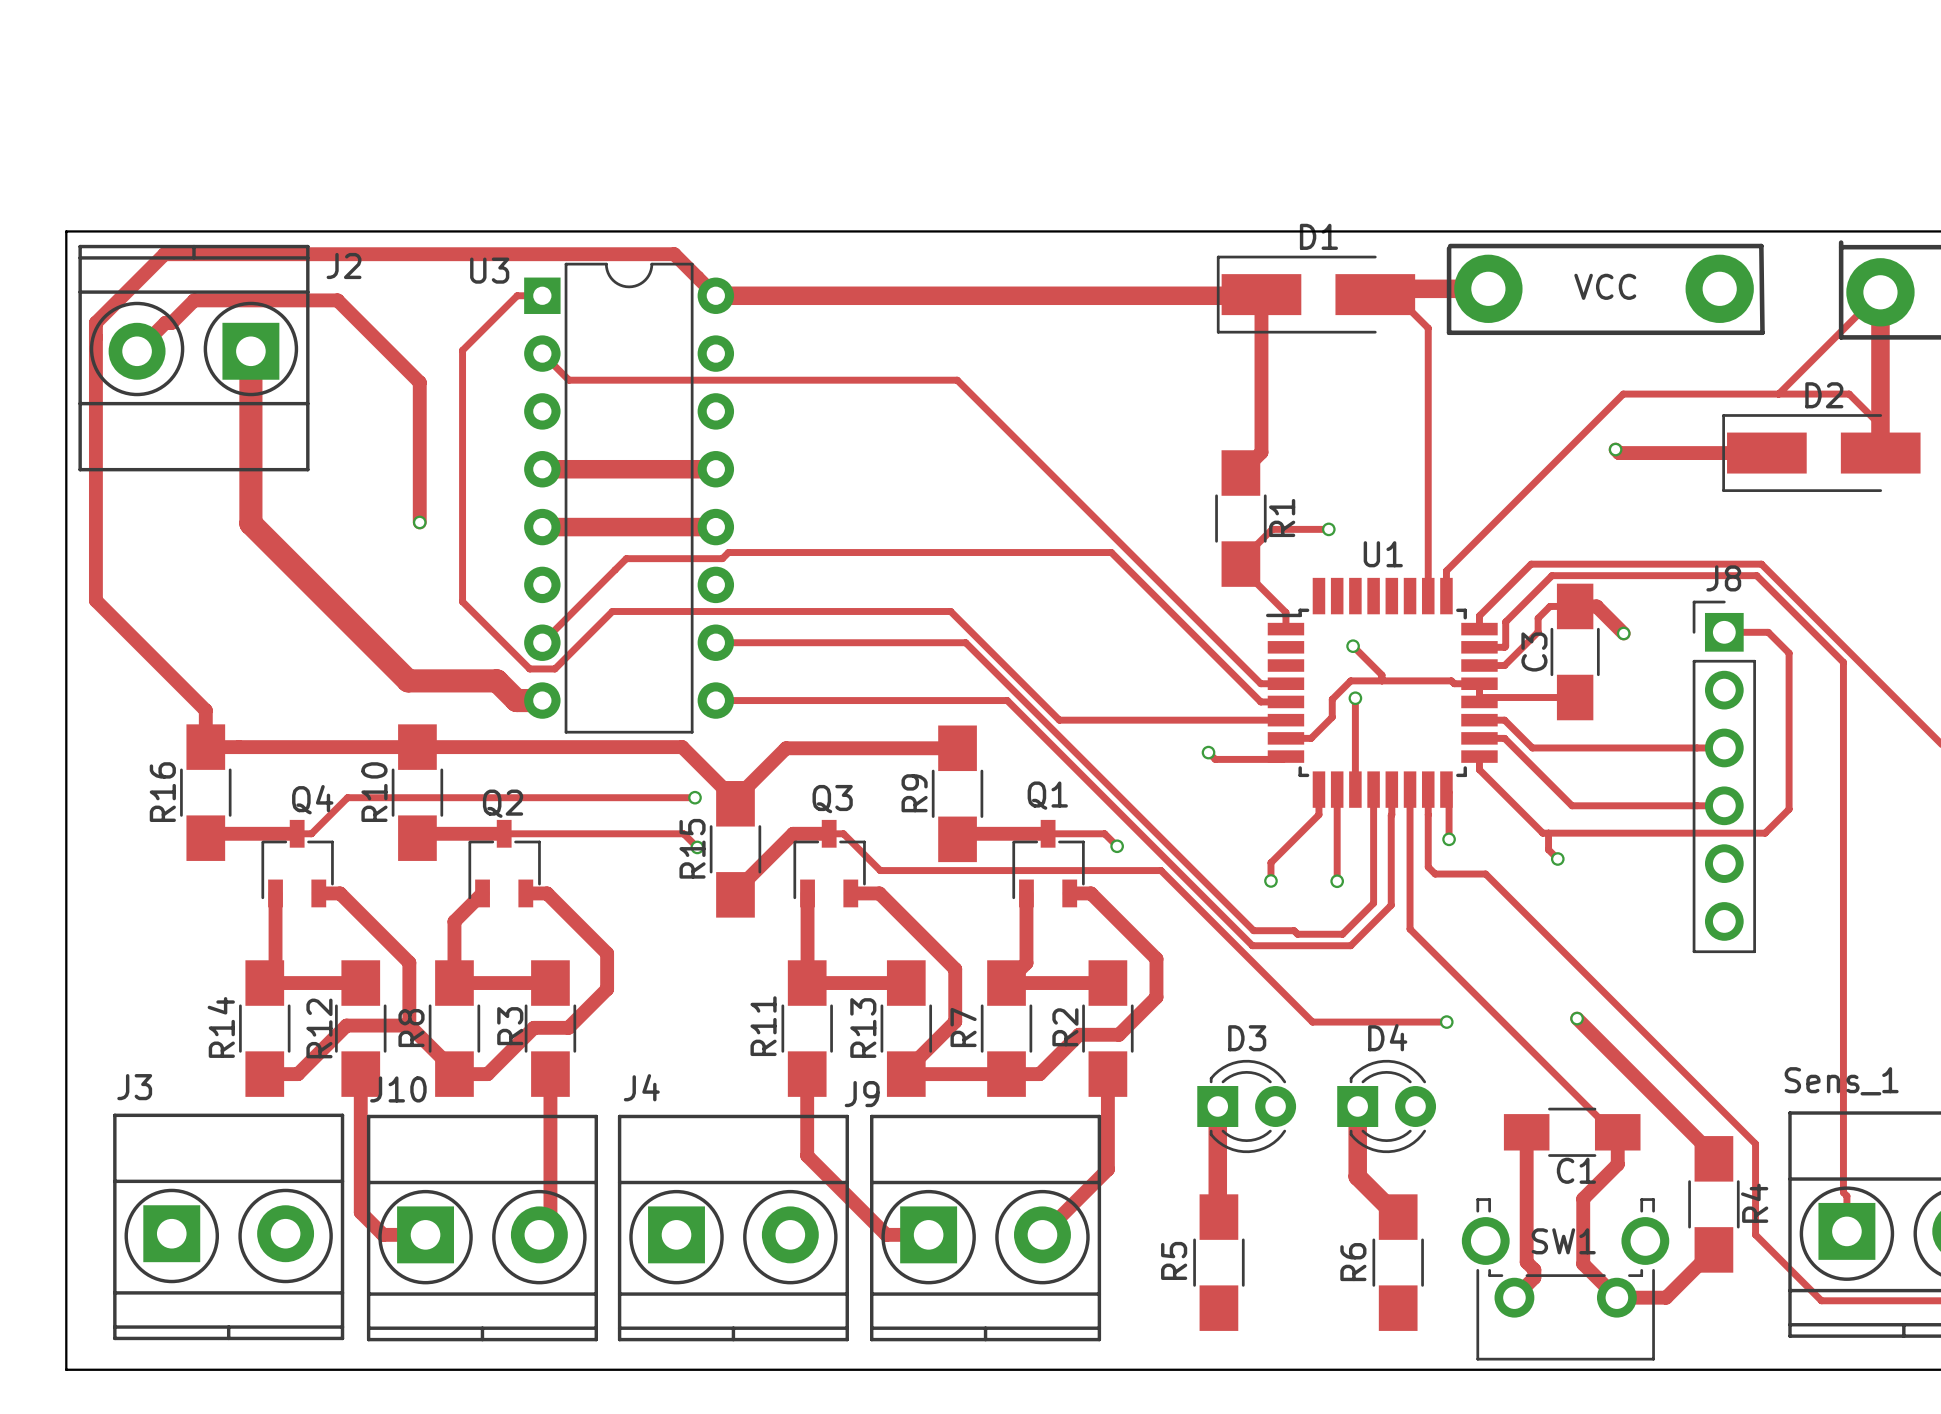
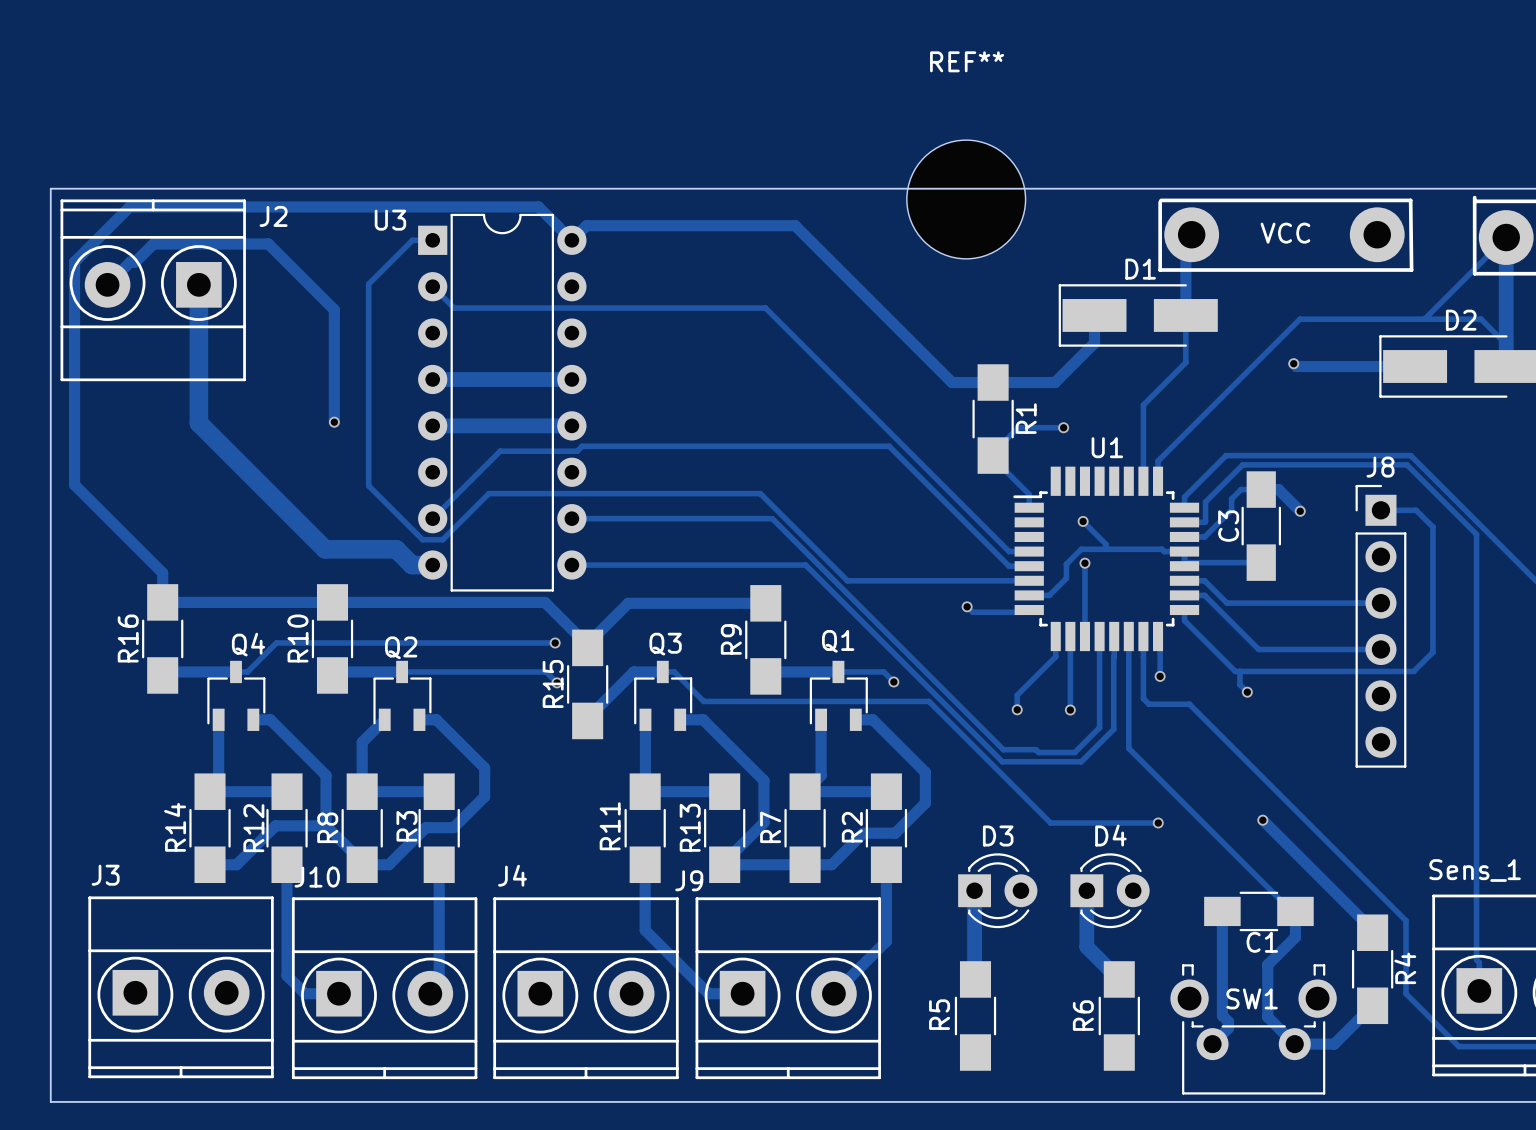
REF**: none -> (966, 199)
track: (1488, 288) (1381, 288) (1375, 294) (1394, 294) (1428, 328) (1428, 501) -> (1191, 234) (1185, 240) (1185, 362) (1143, 405)
D1 position: (1315, 294) -> (1138, 315)
track: (715, 295) (1261, 294) (1261, 452) (1240, 473) -> (571, 240) (586, 225) (795, 225) (952, 382) (1055, 382) (1094, 343) (1094, 315)

